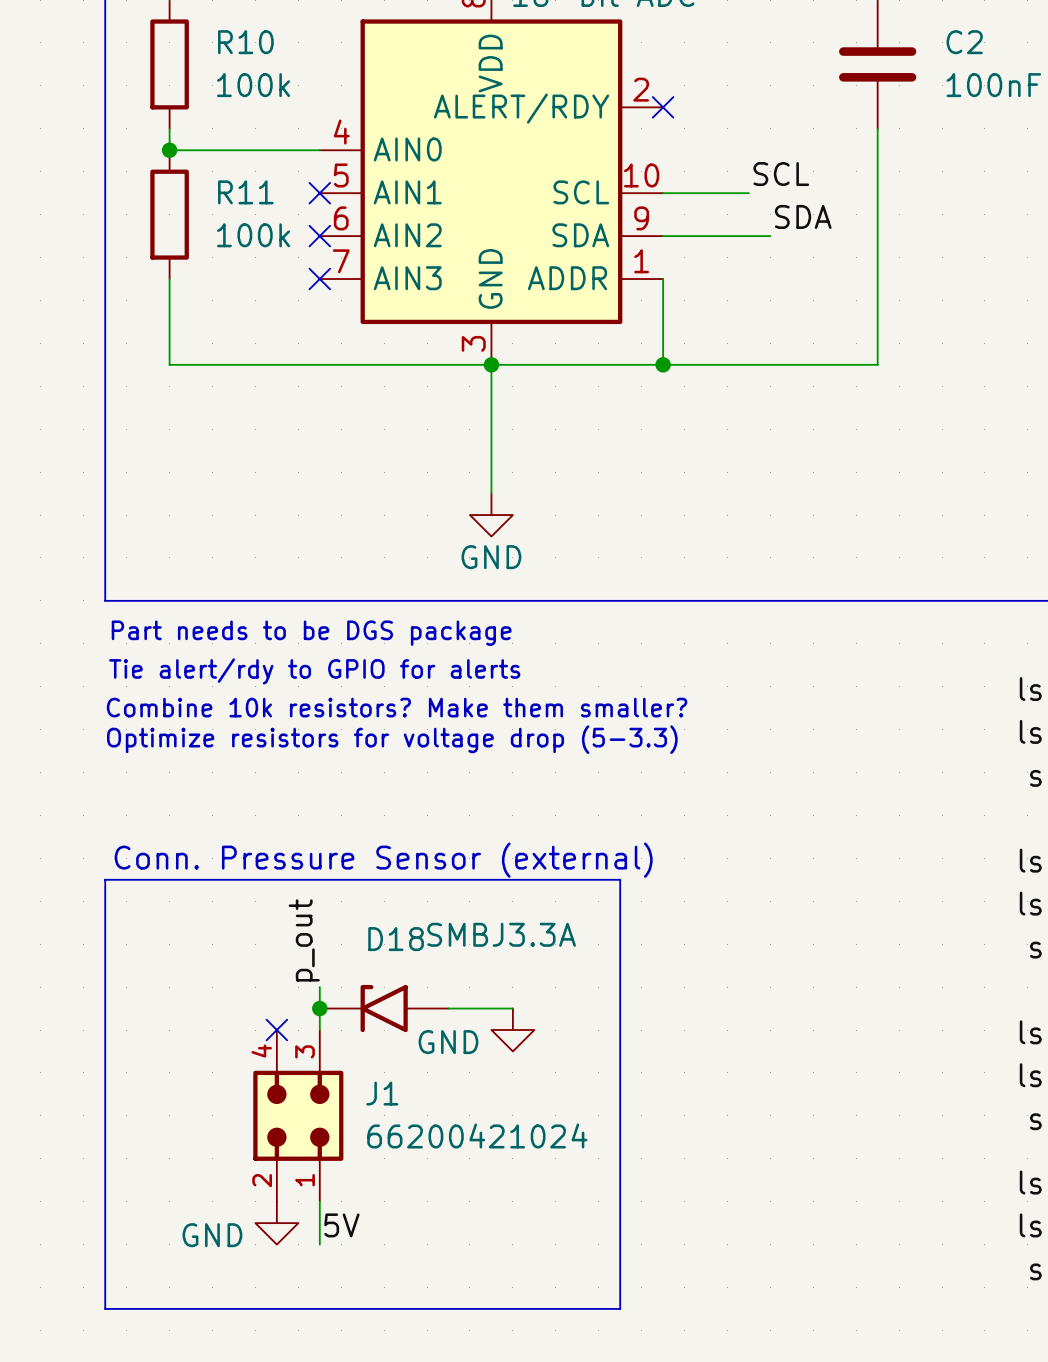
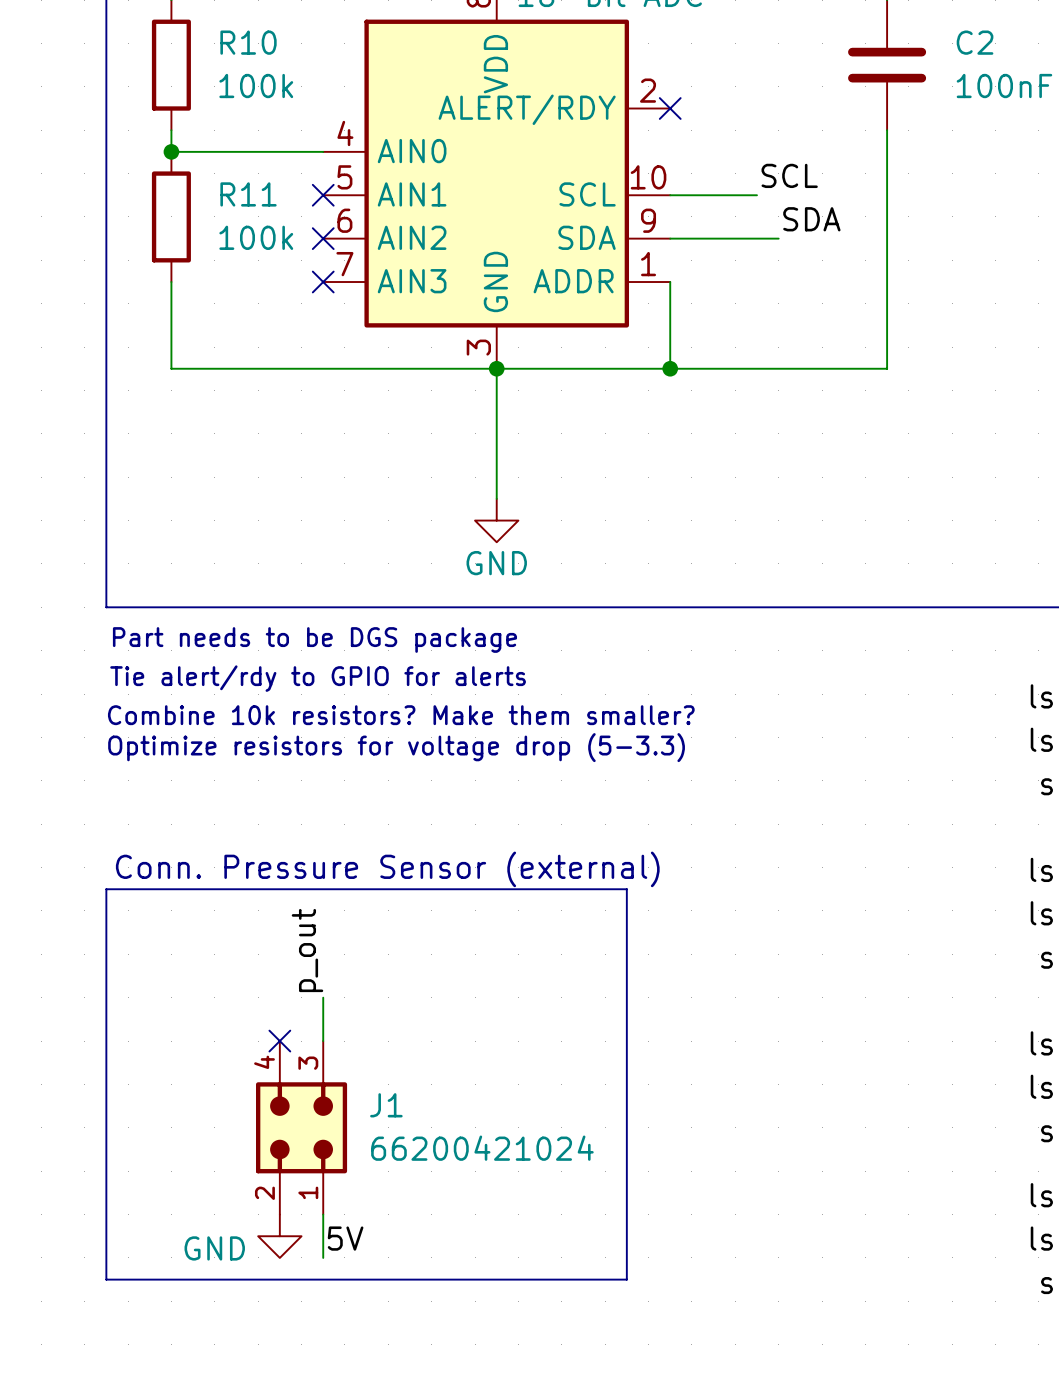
junction: (319, 1008) -> none
D18: SMBJ3.3A (384, 1008) -> none
wire: (448, 1008) (512, 1008) -> none
power symbol: GND (512, 1030) -> none
line: (105, 1266) (105, 1308) (620, 1308) (620, 1266) -> (106, 1279) (626, 1279)

